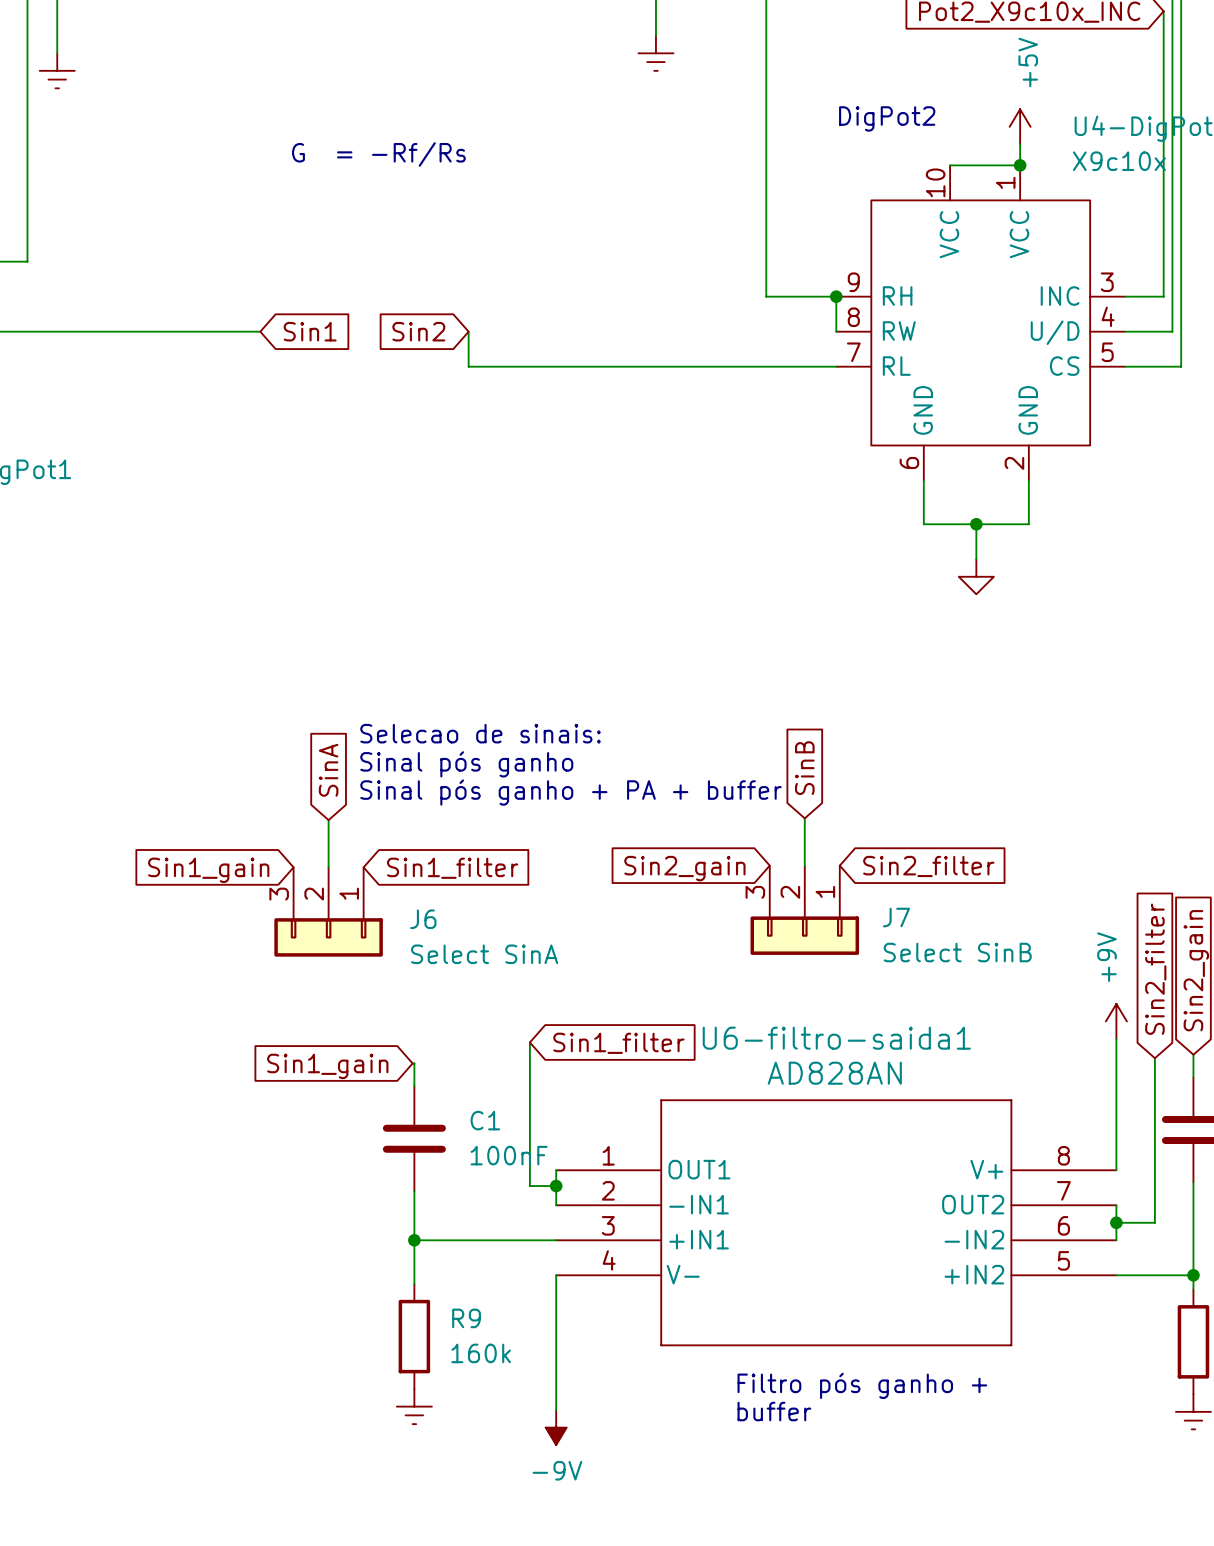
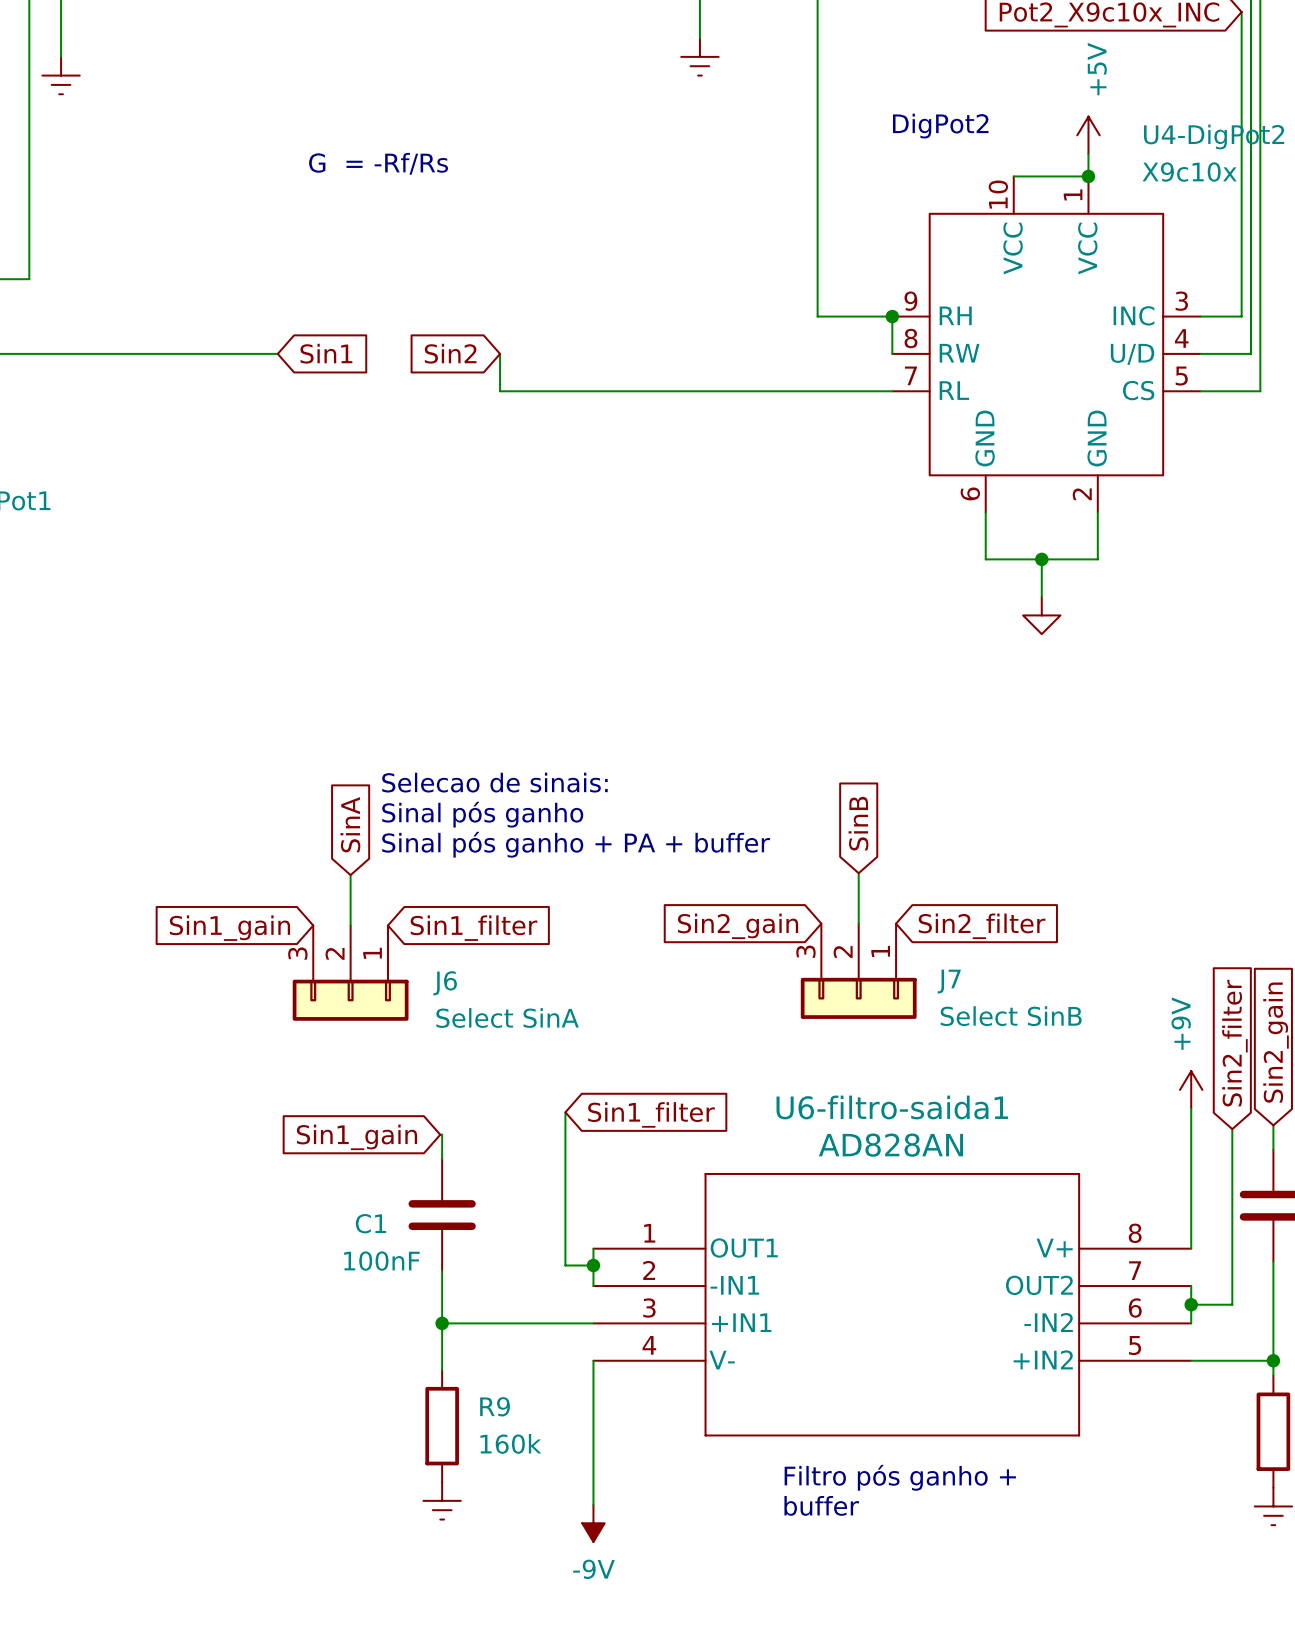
C1 name position: C1 (485, 1120) -> C1 (370, 1223)
C1 value position: 100nF (509, 1155) -> 100nF (381, 1261)

